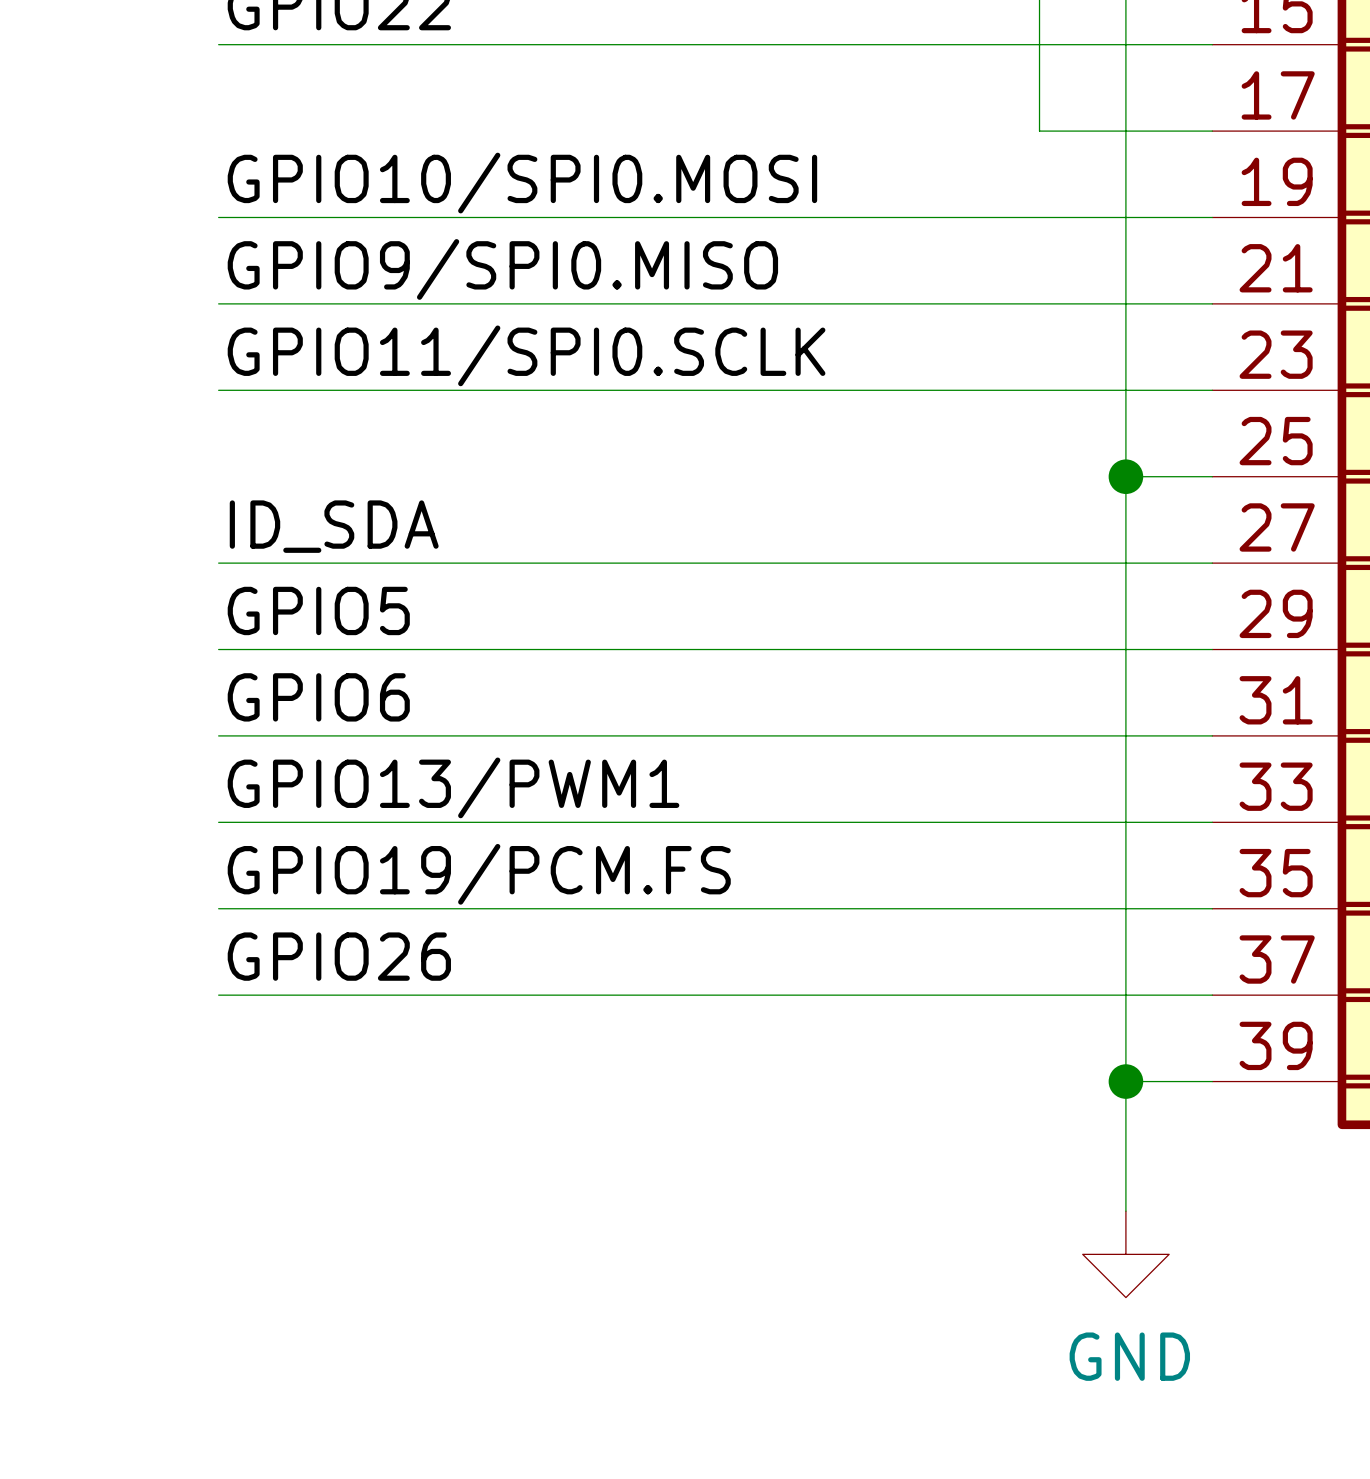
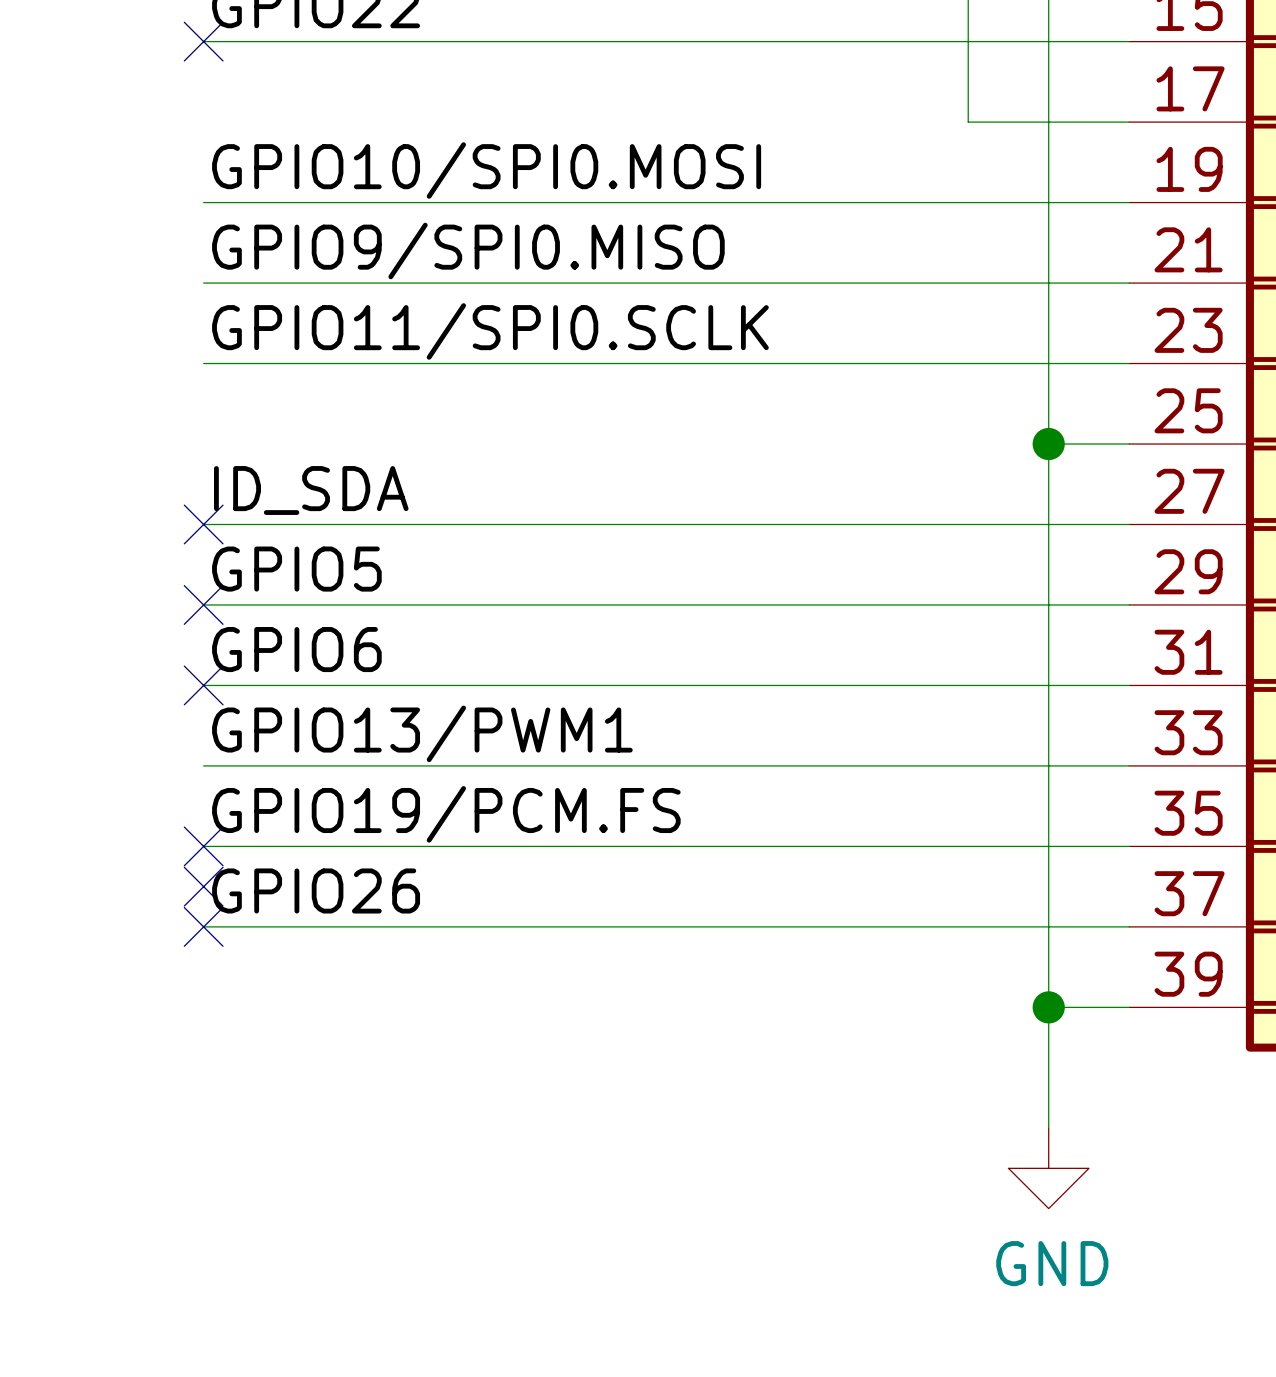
no-connect mark: none -> (203, 41)
no-connect mark: none -> (203, 524)
no-connect mark: none -> (203, 604)
no-connect mark: none -> (203, 685)
no-connect mark: none -> (203, 846)
no-connect mark: none -> (203, 886)
no-connect mark: none -> (203, 926)

